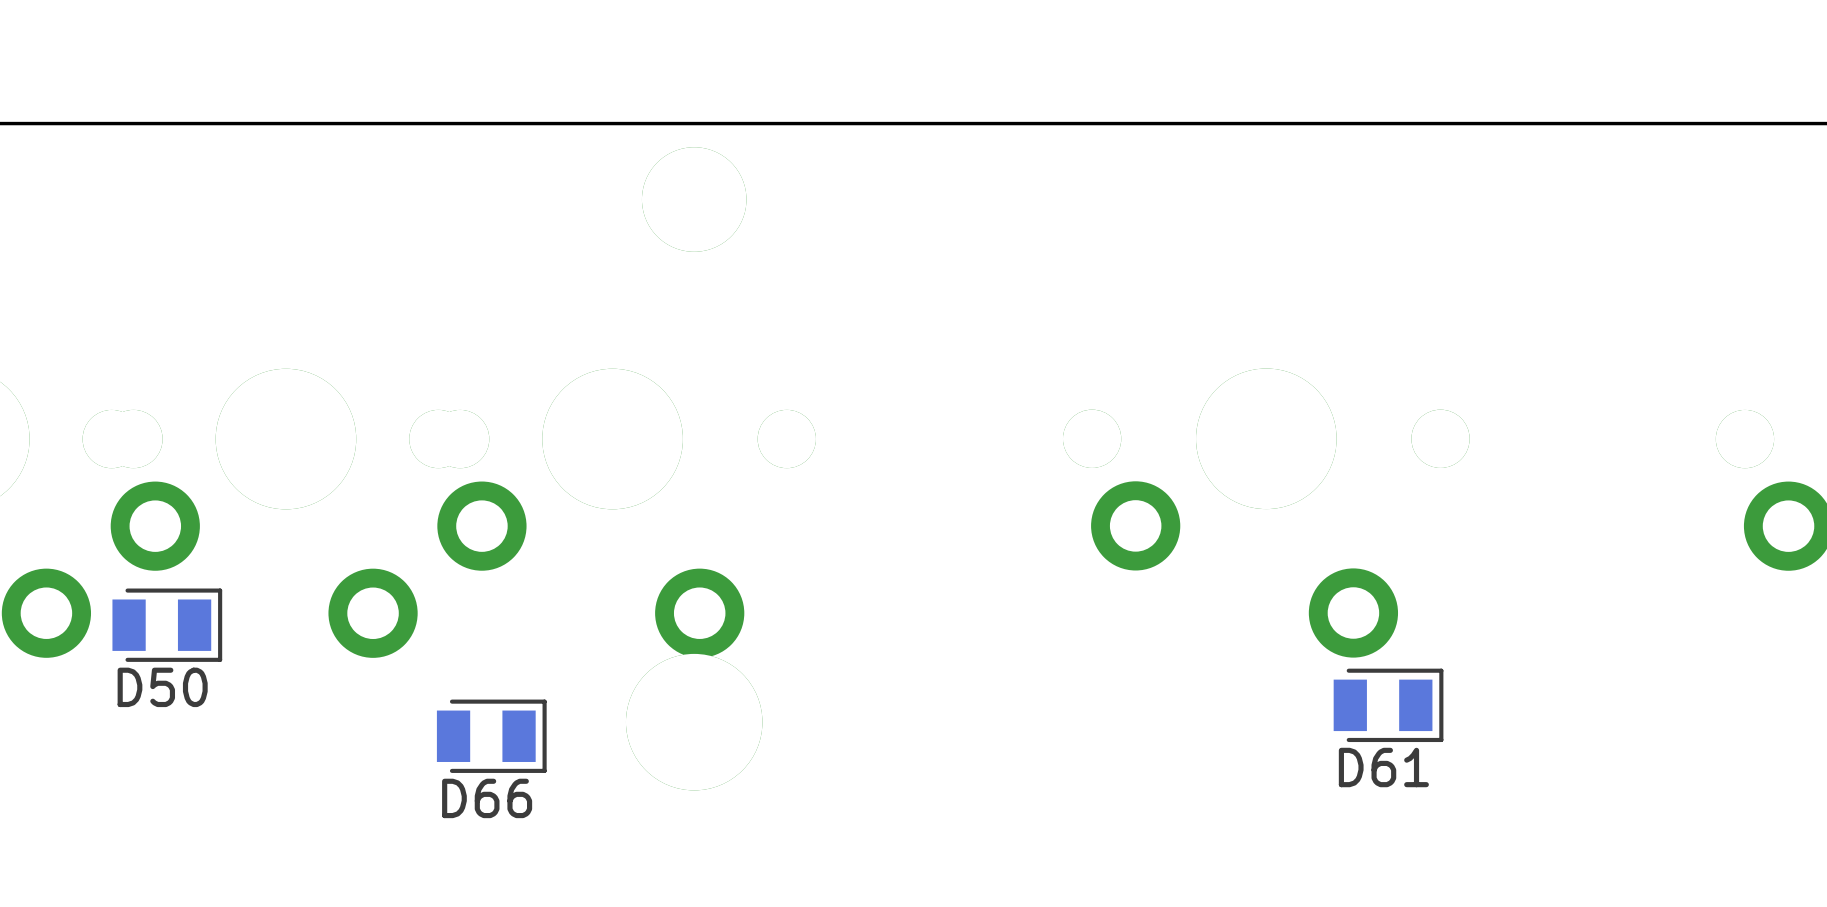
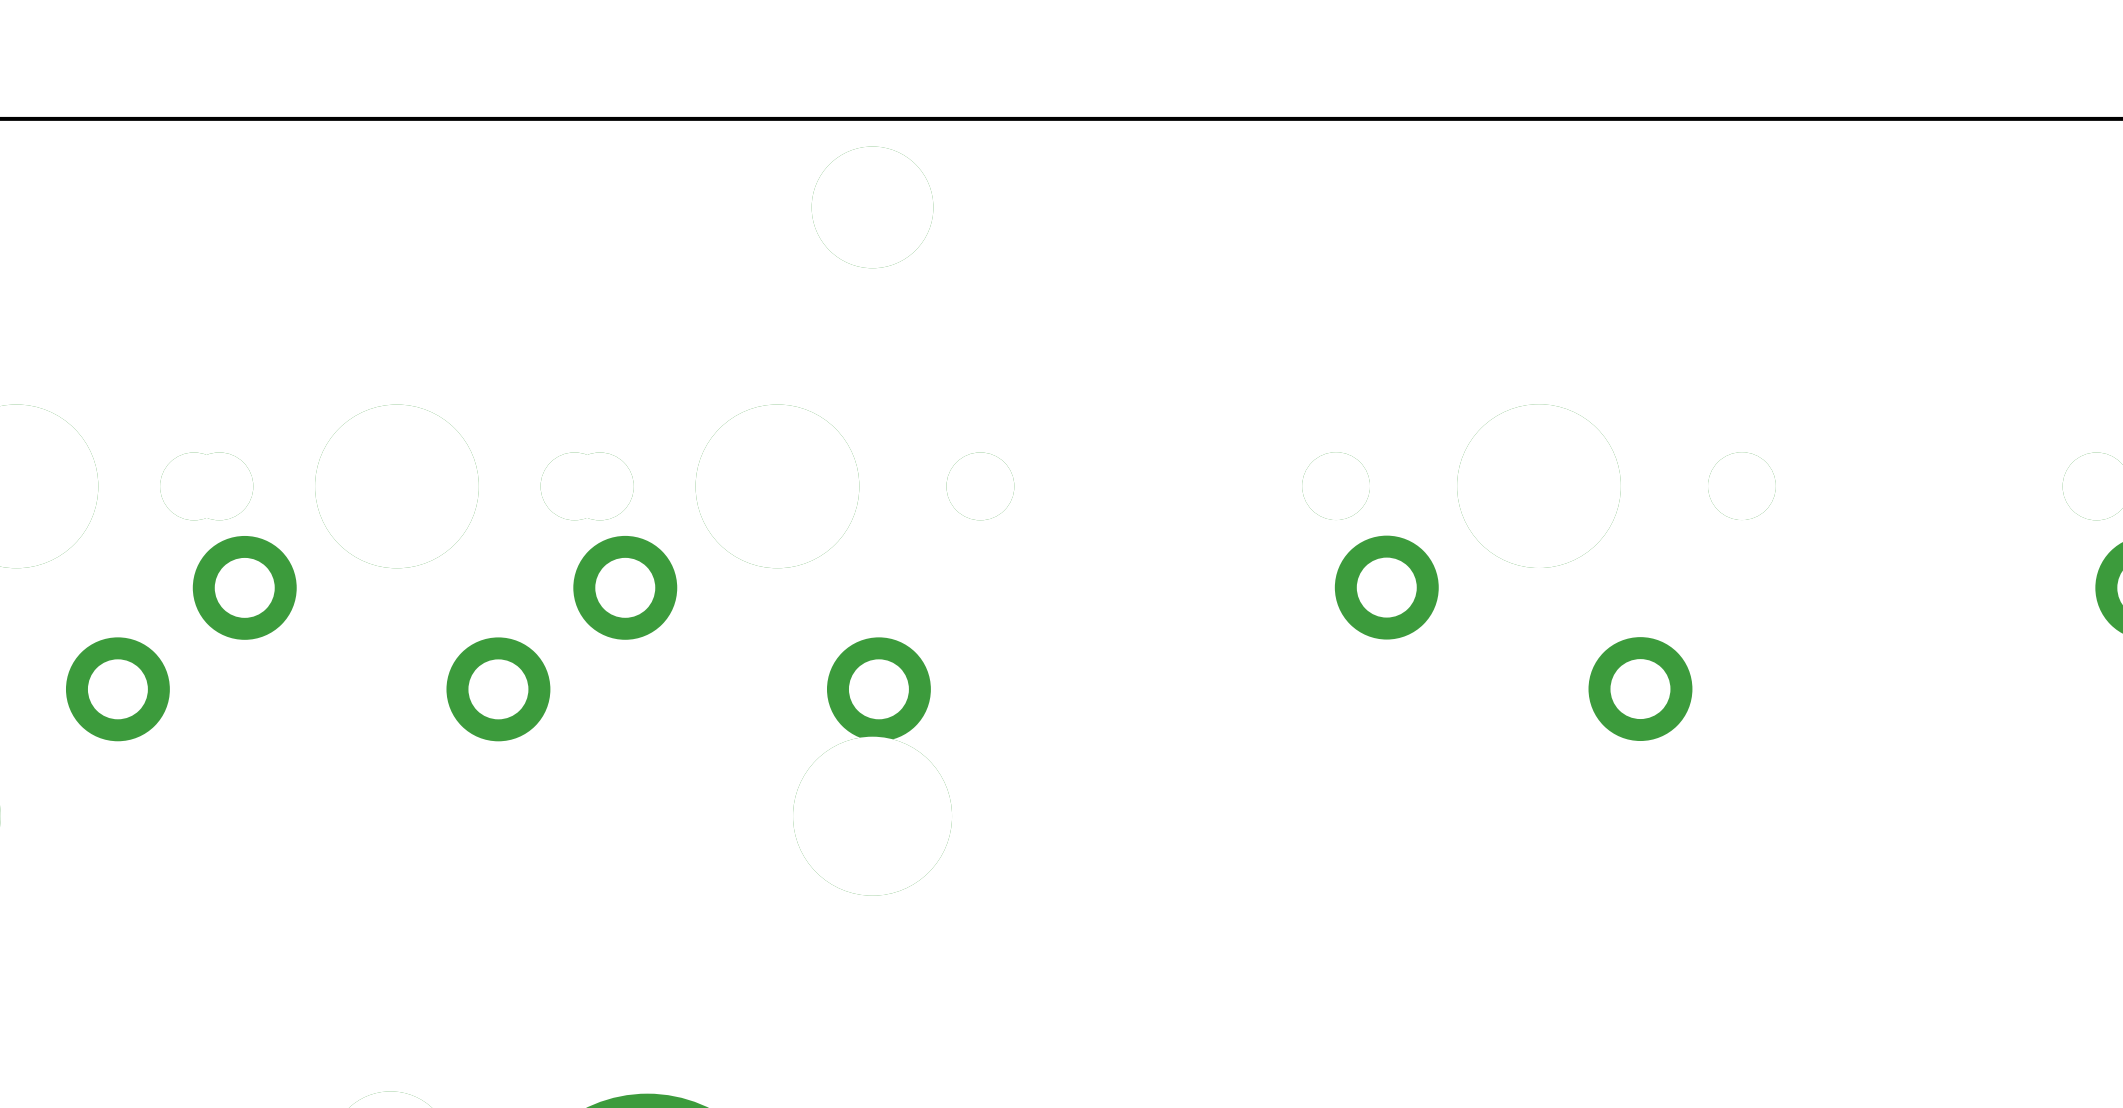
D50: (167, 625) -> none
D61: (1388, 705) -> none
D66: (491, 736) -> none

